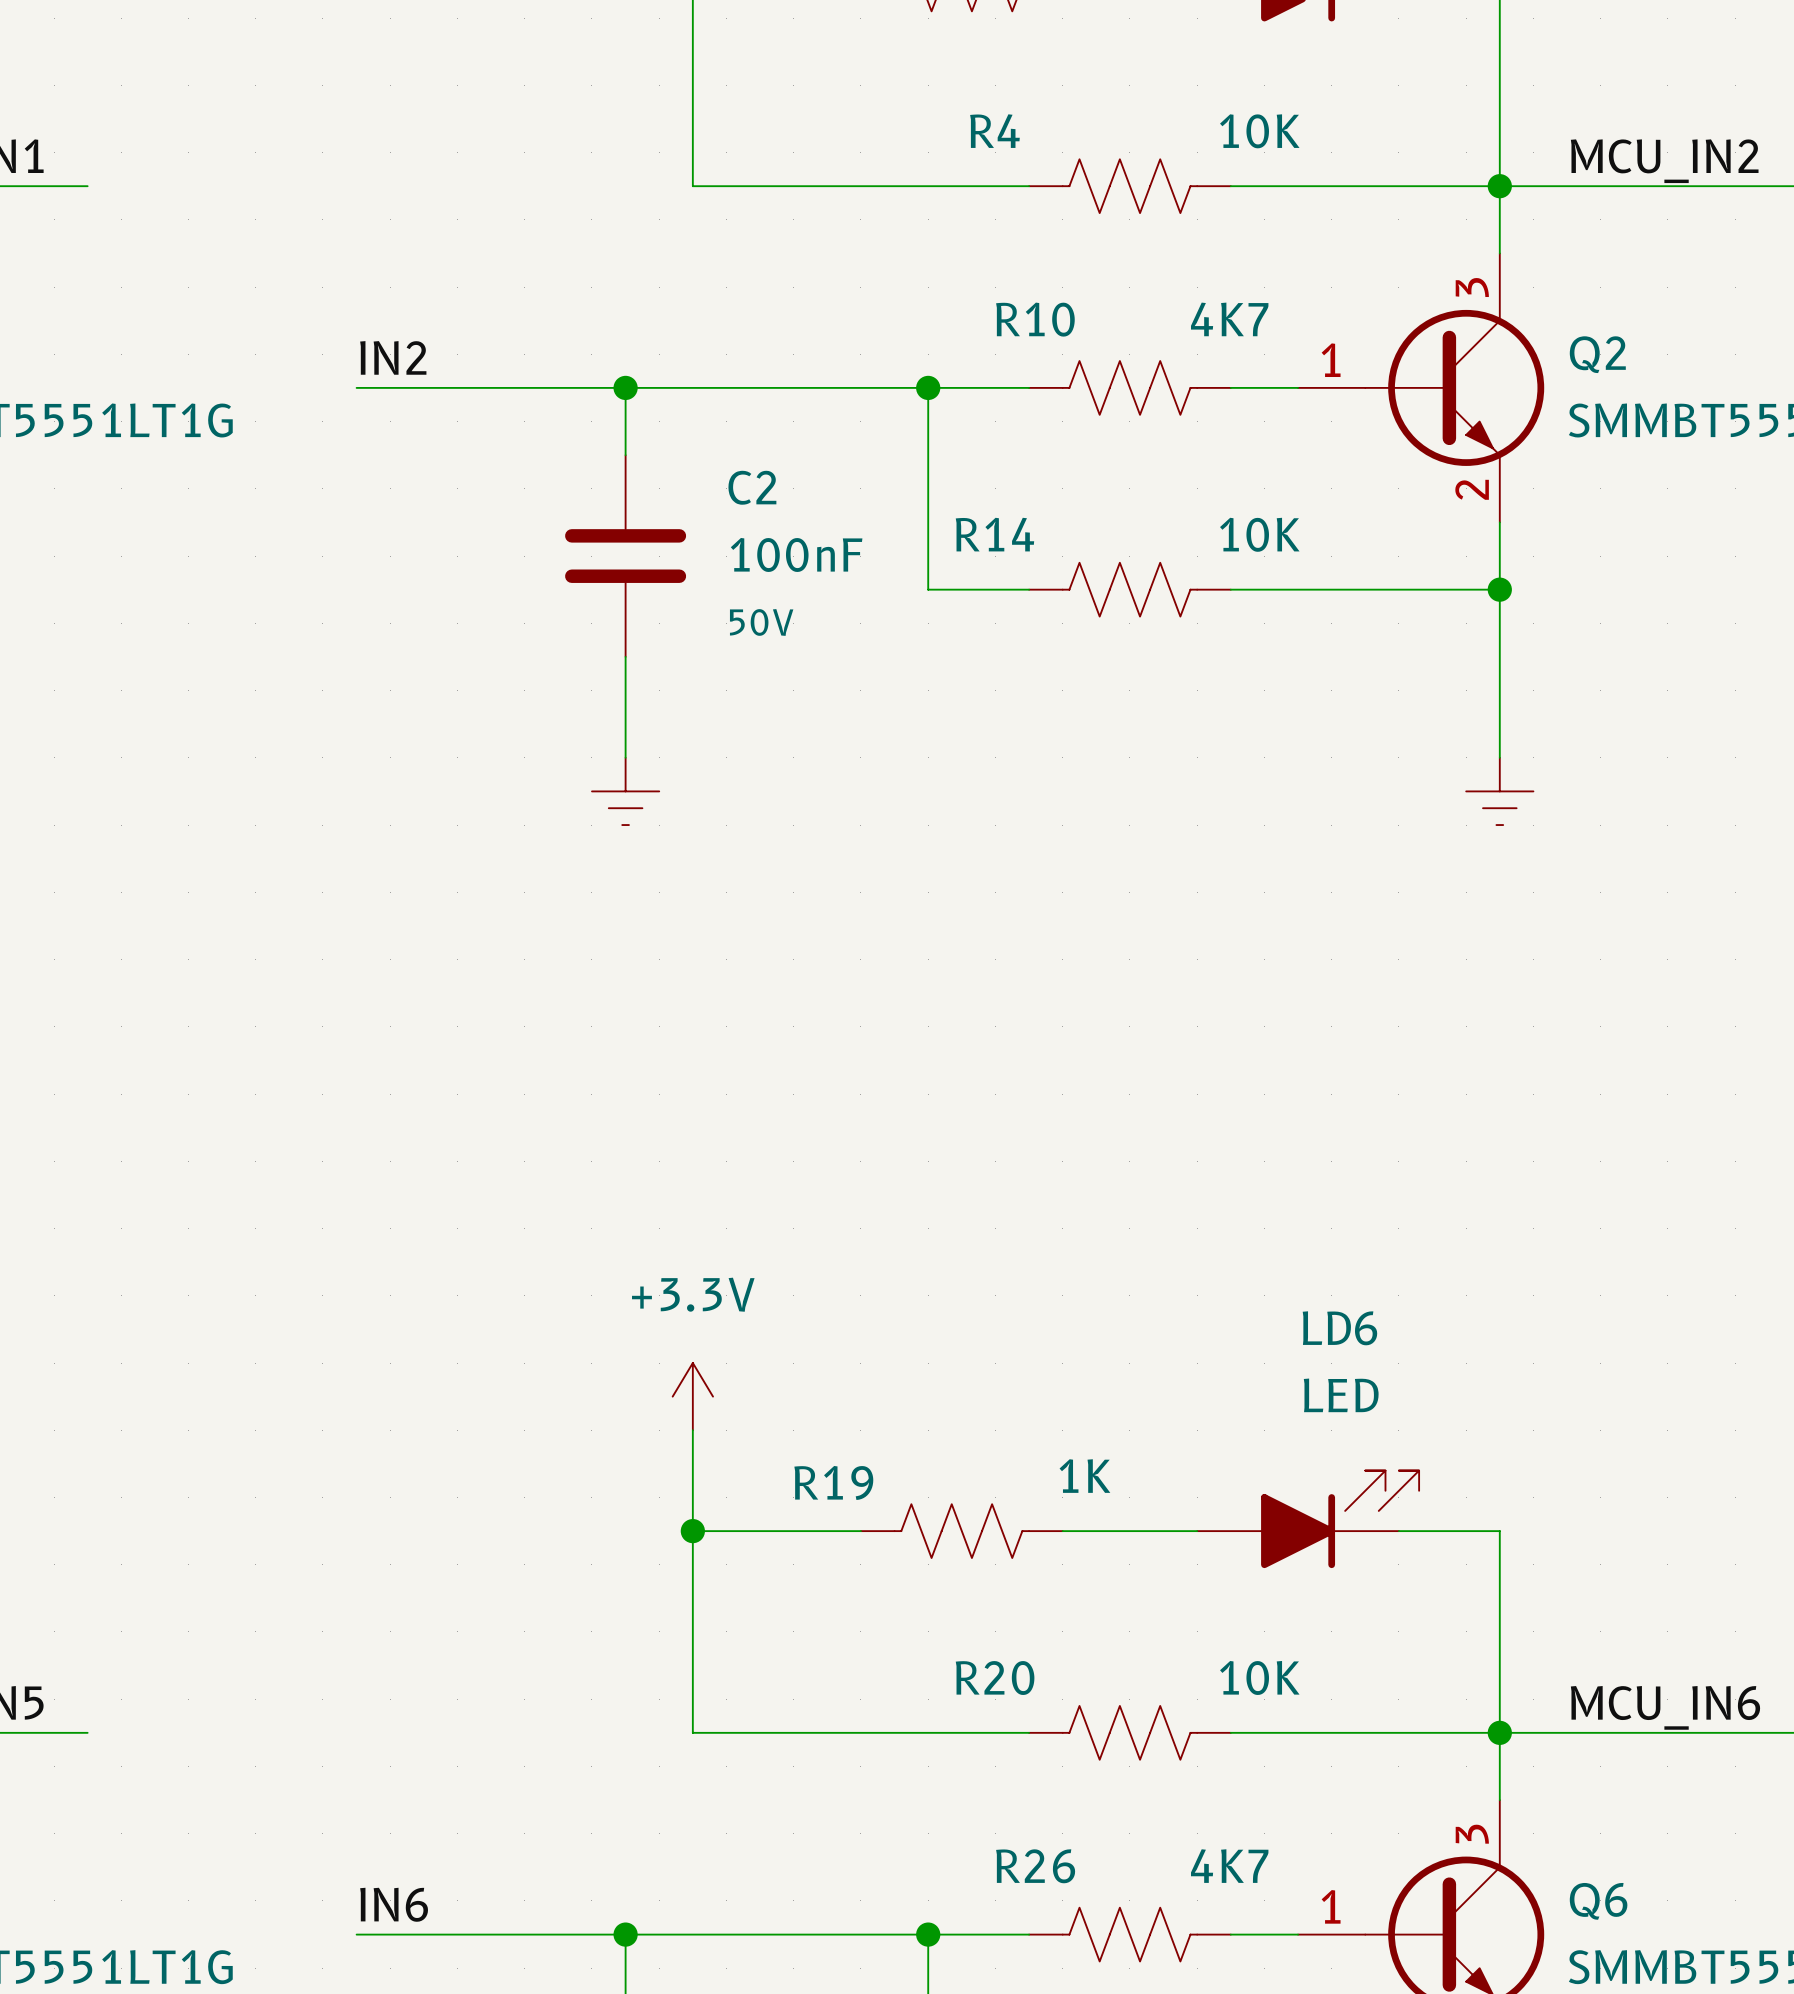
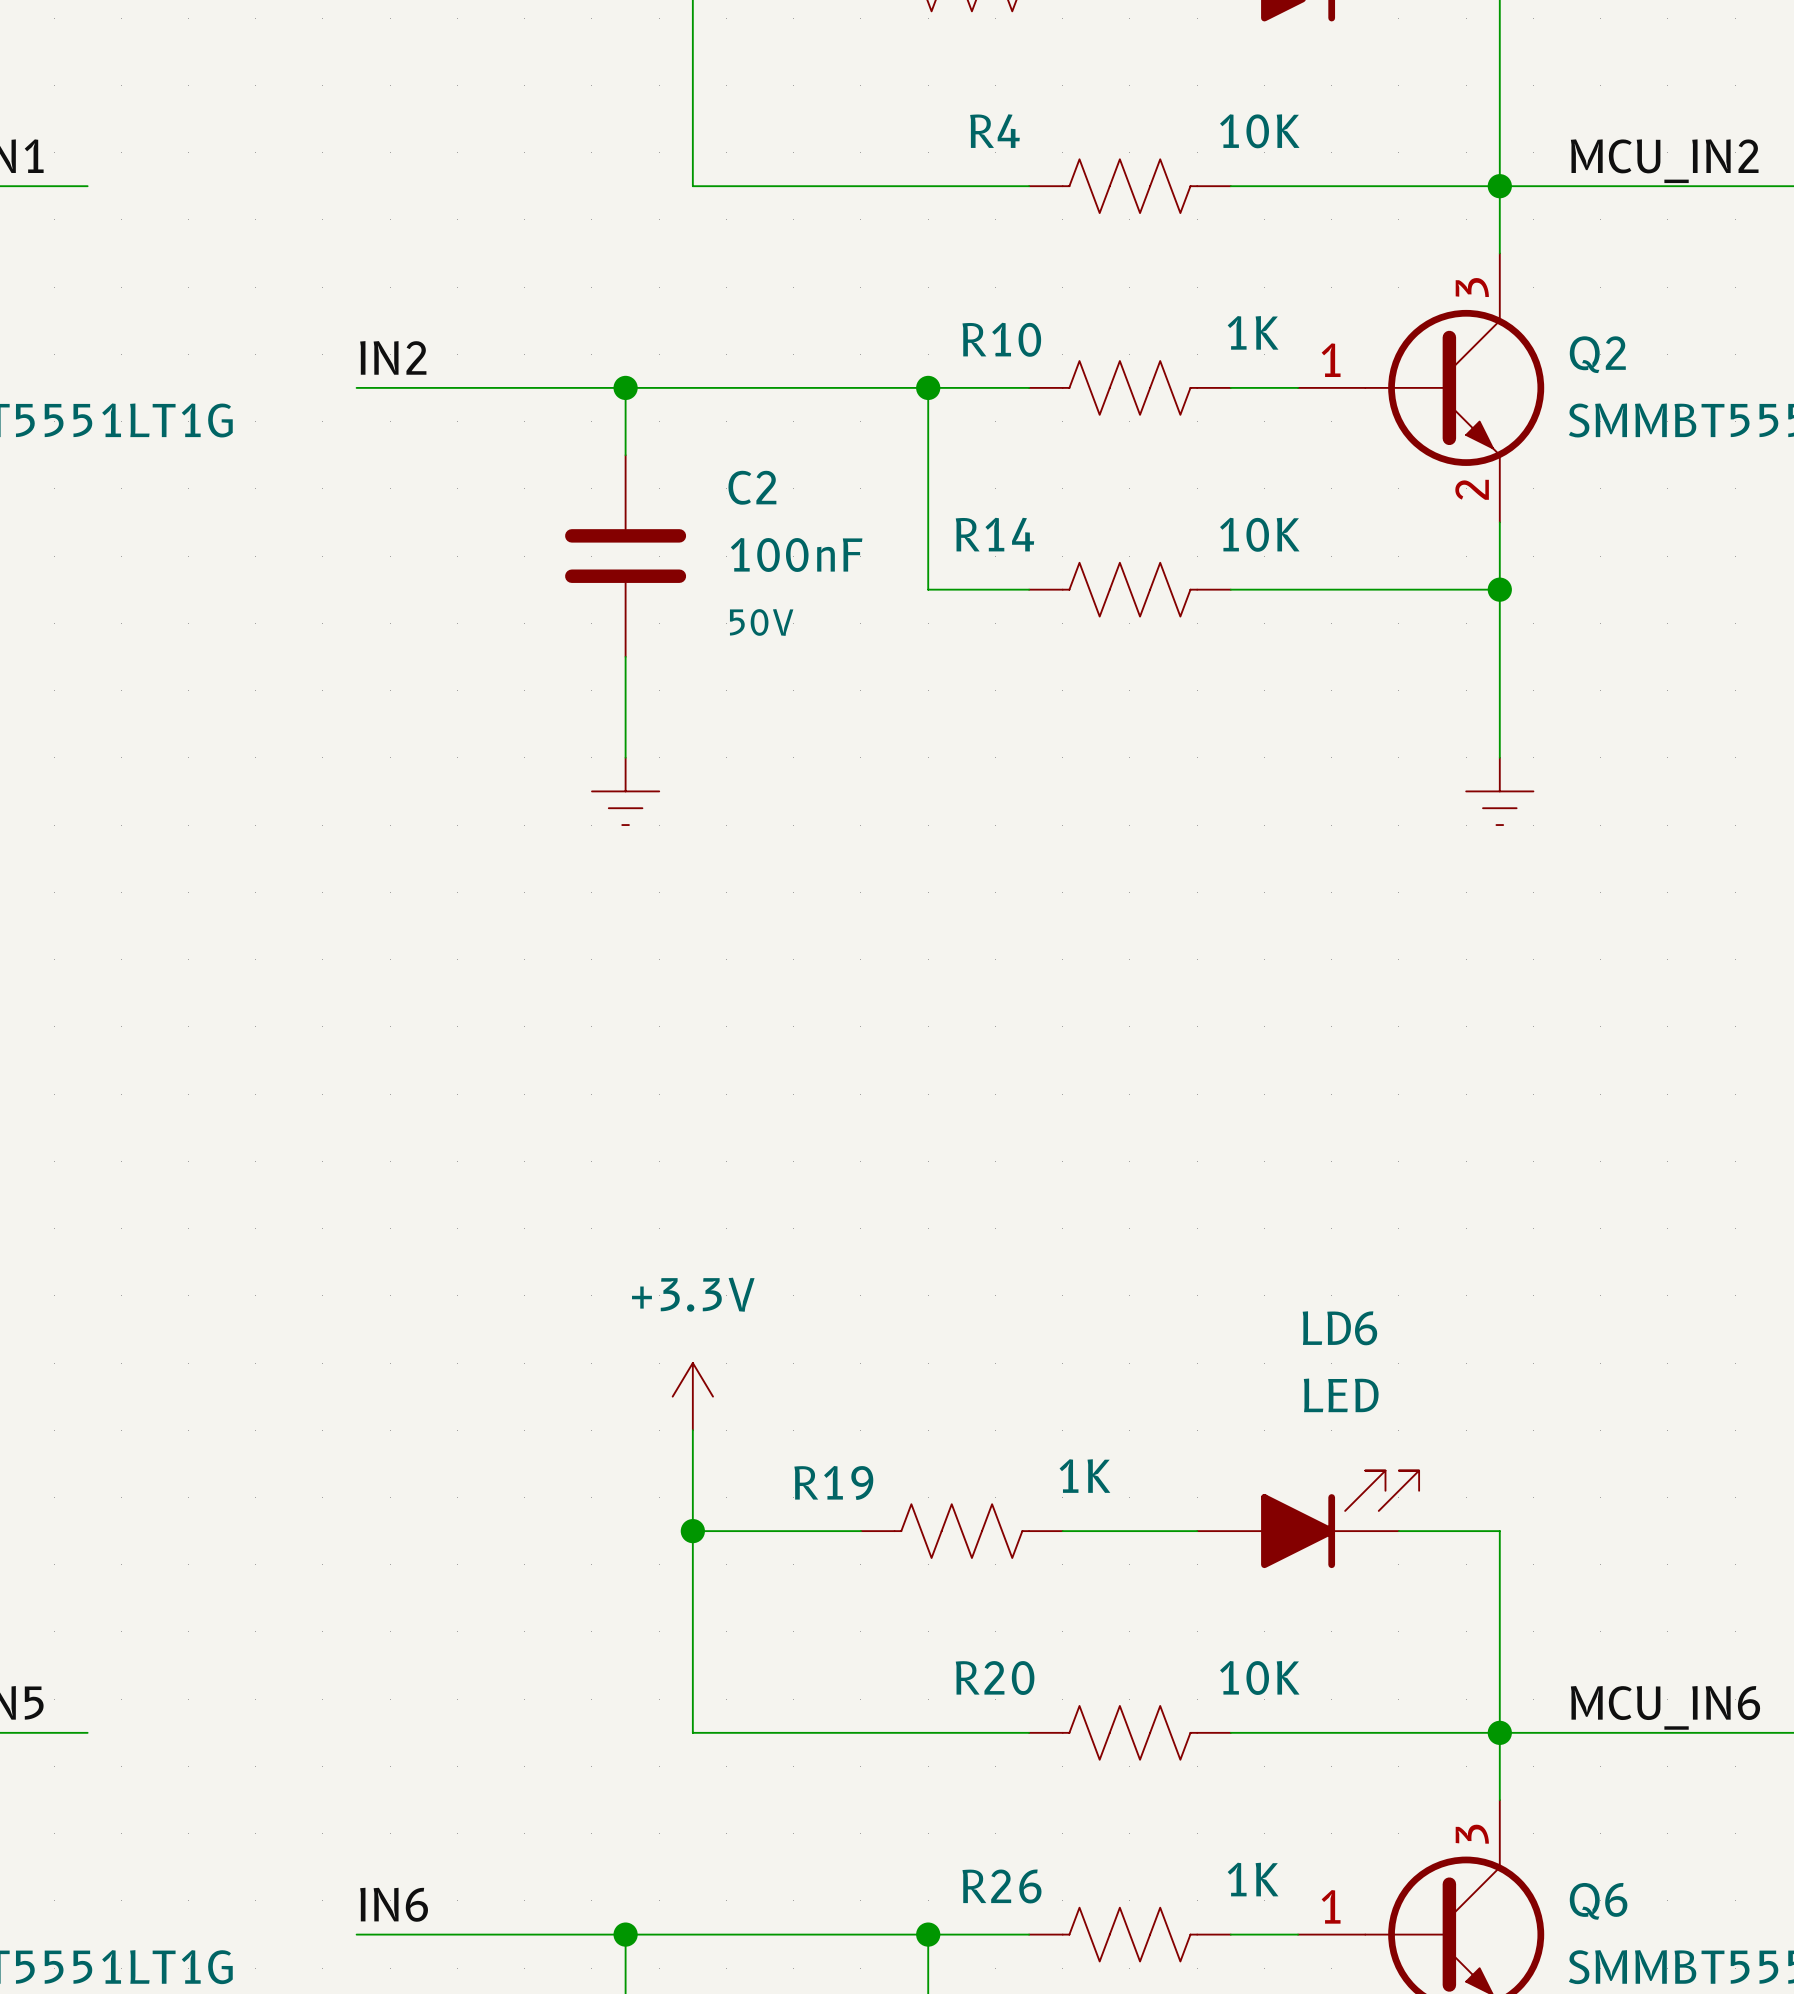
R10 name position: R10 (1035, 319) -> R10 (1001, 339)
R10 value: 4K7 (1229, 319) -> 1K (1253, 332)
R26 name position: R26 (1035, 1866) -> R26 (1001, 1886)
R26 value: 4K7 (1229, 1866) -> 1K (1253, 1879)

